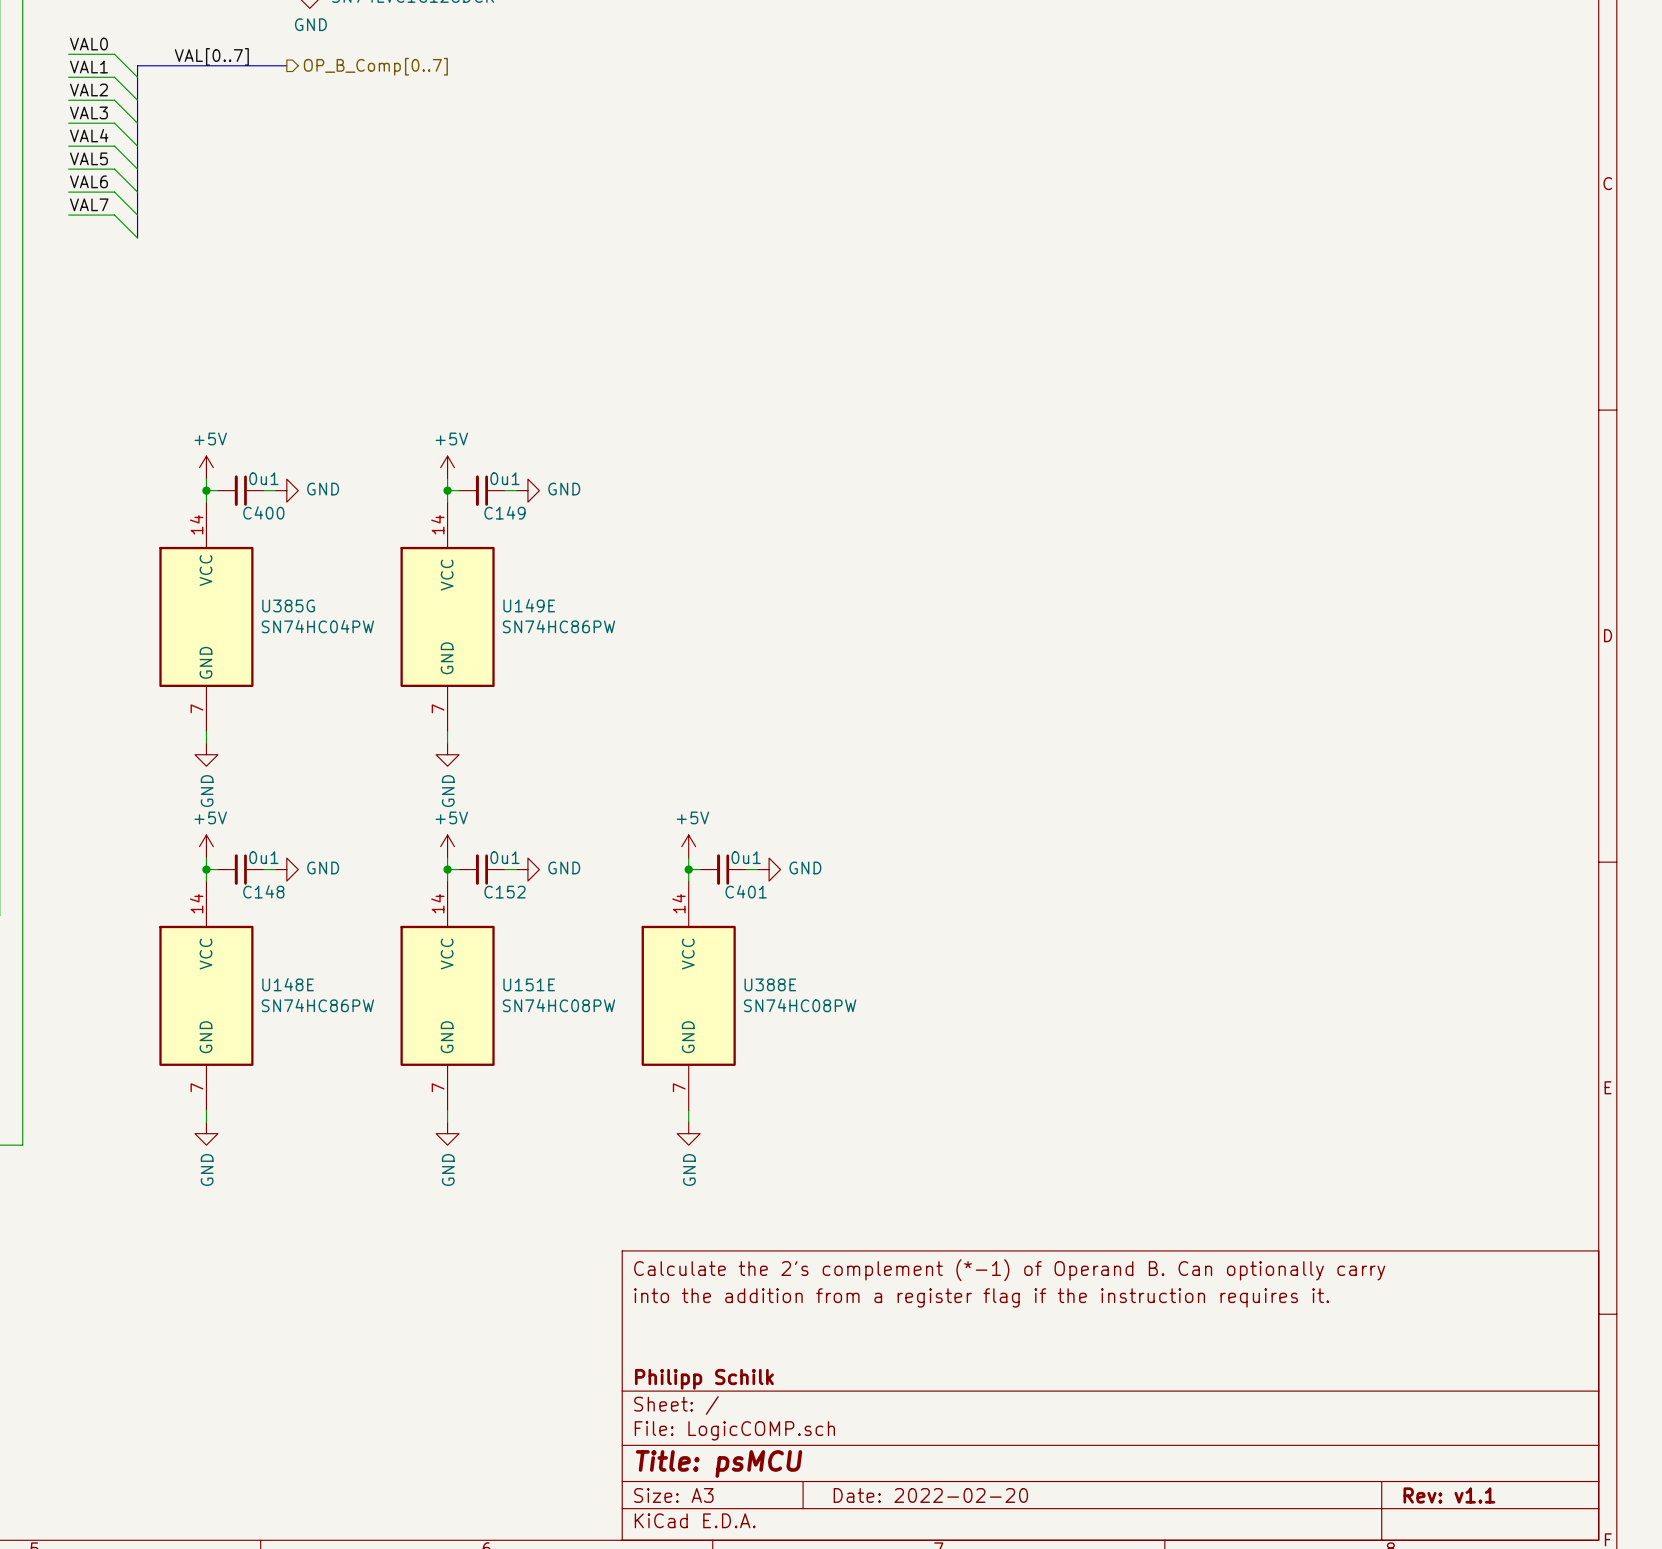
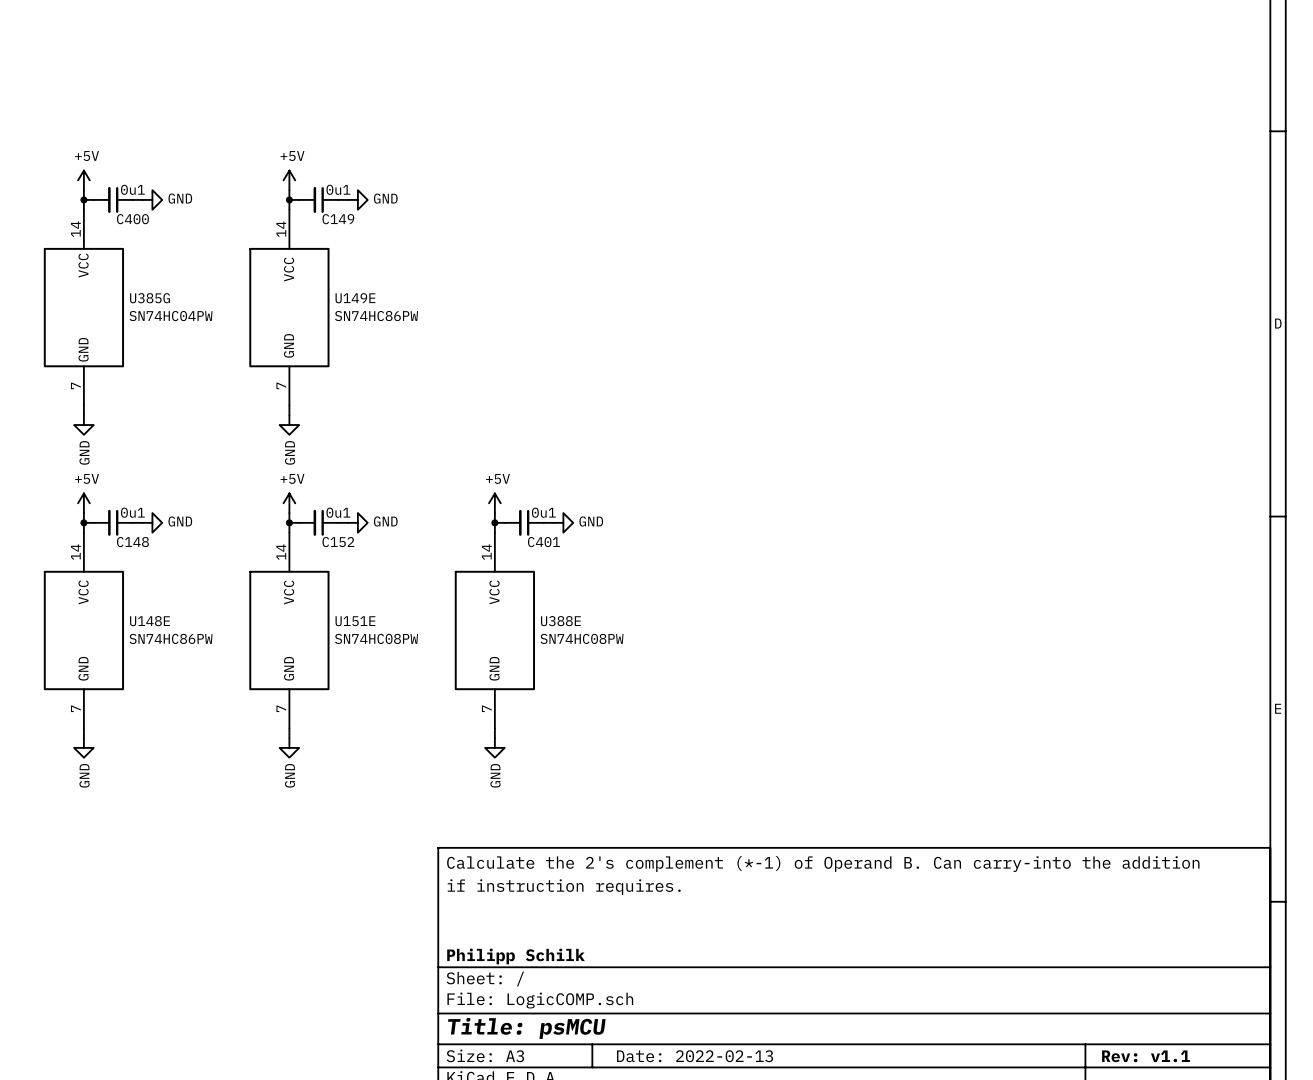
title block: Calculate the 2's complement (*-1) of Operand B. Can optionally carry (1009, 1270) -> Calculate the 2's complement (*-1) of Operand B. Can carry-into the addition (823, 863)
title block: into the addition from a register flag if the instruction requires it. (981, 1297) -> if instruction requires. (564, 887)
title block: Date: 2022-02-20 (930, 1495) -> Date: 2022-02-13 (695, 1056)

